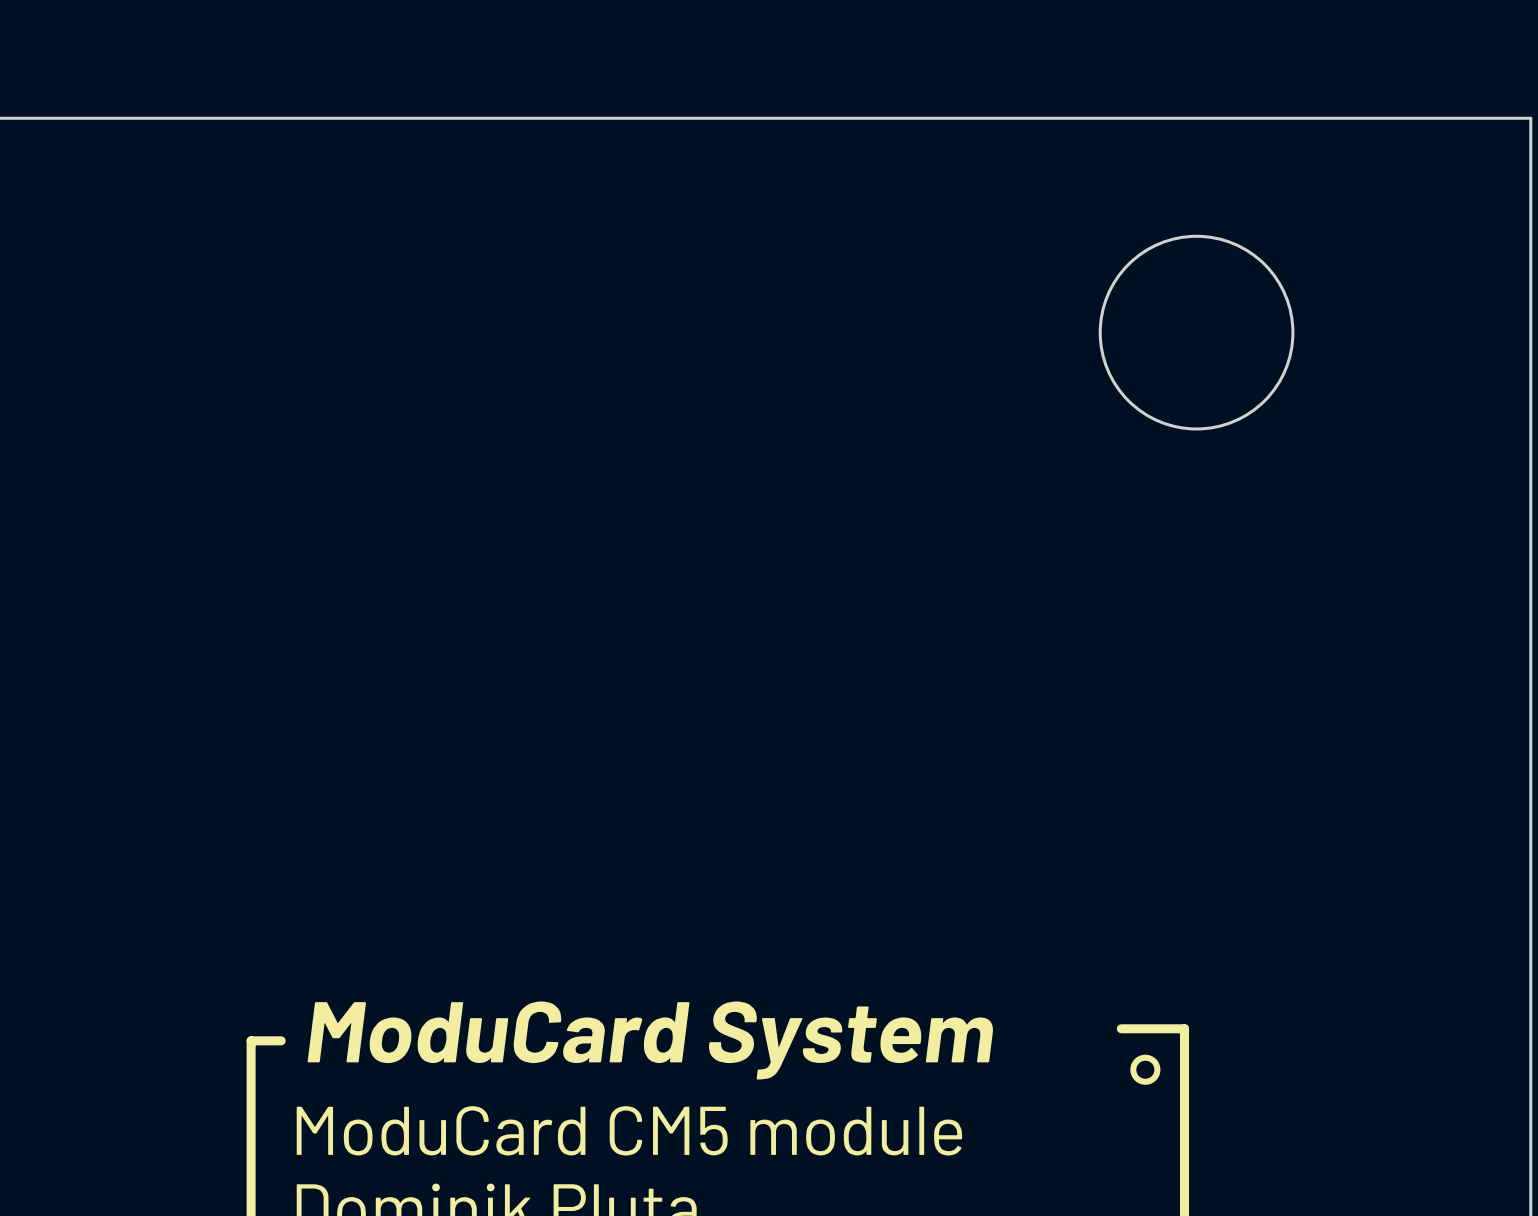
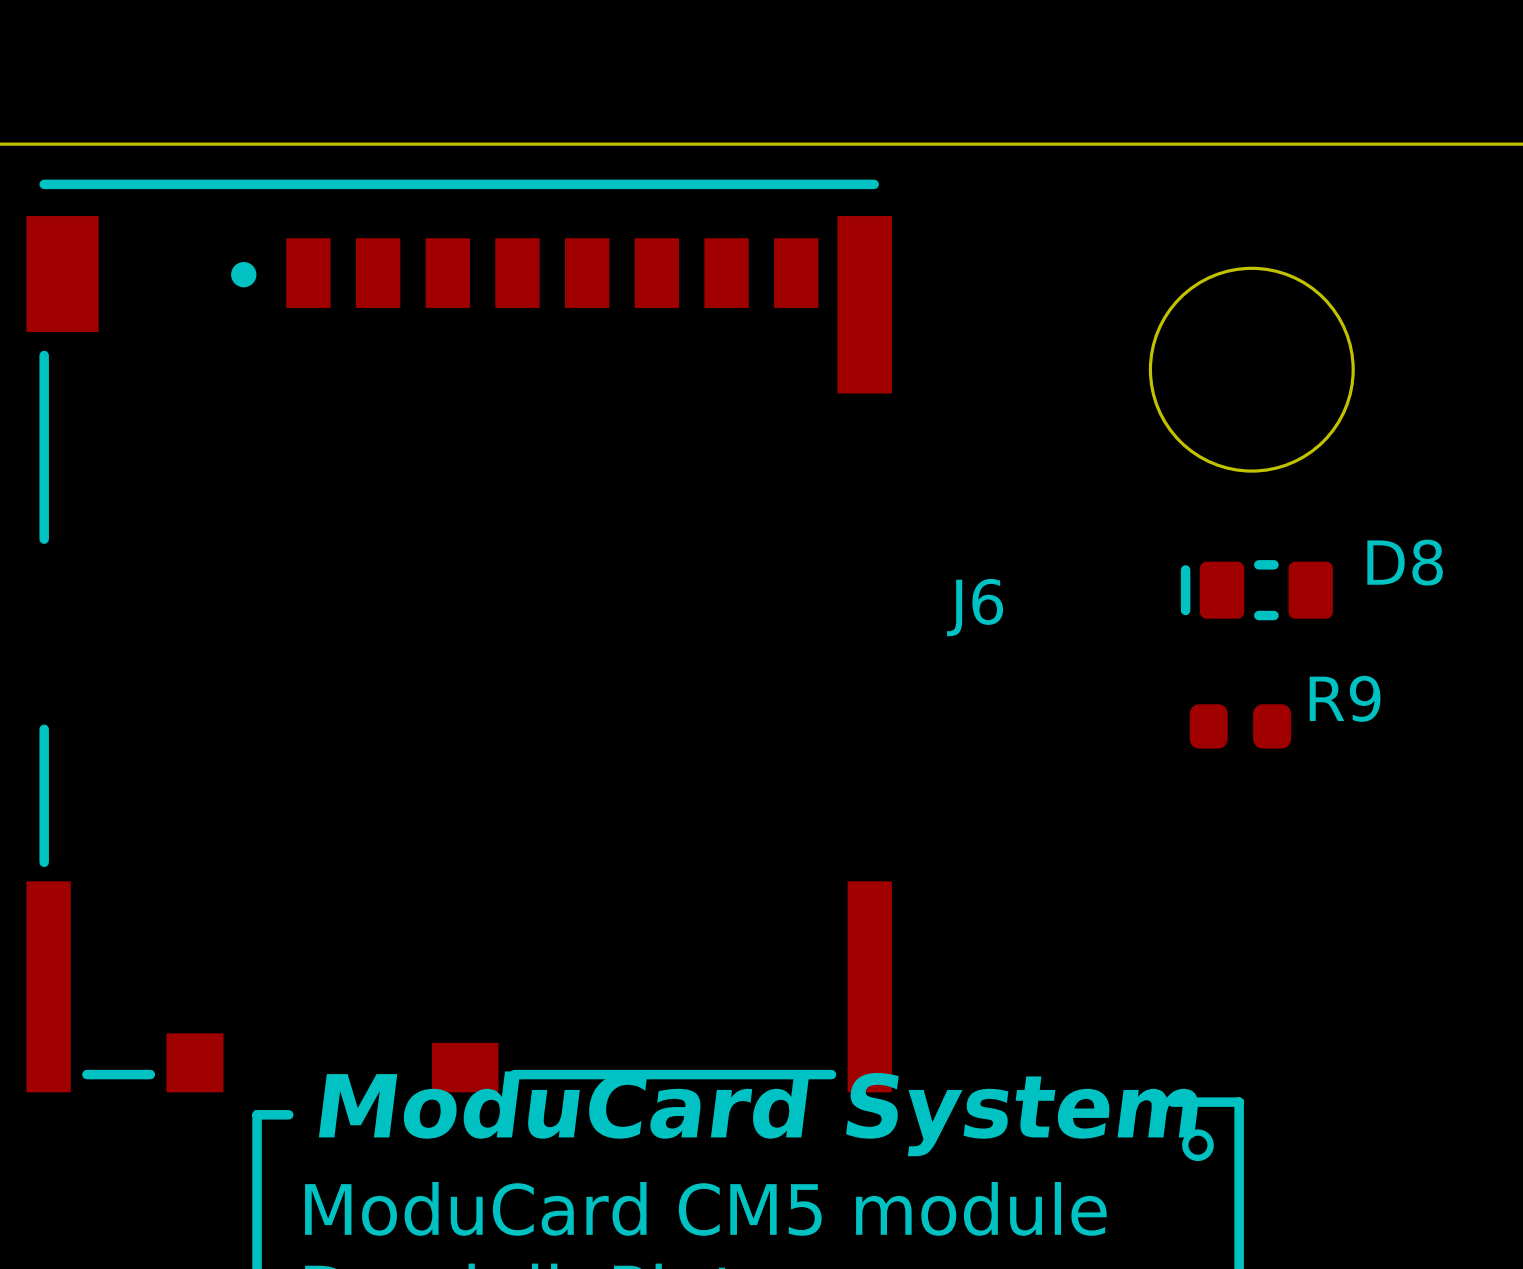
D8: none -> (1256, 590)
J6: none -> (459, 635)
R9: none -> (1240, 726)

